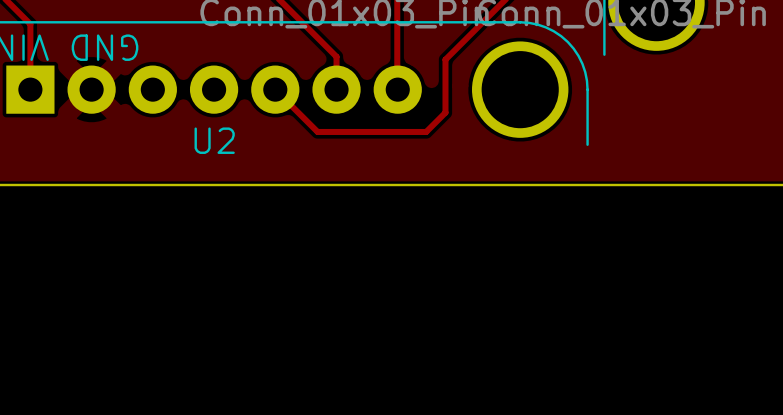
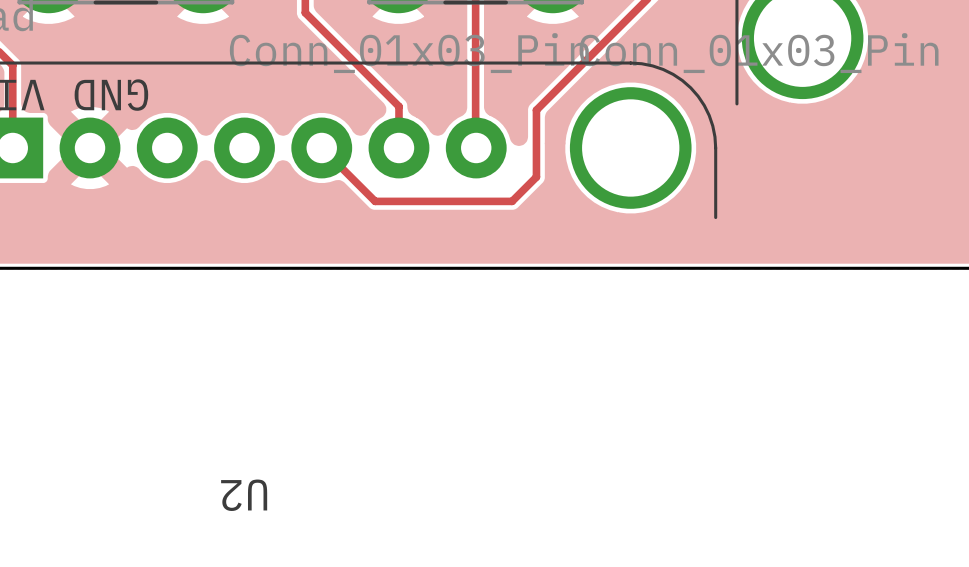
U2 name rotation: 0° (214, 140) -> 180° (244, 495)
U2 name position: U2 (214, 140) -> U2 (244, 495)

